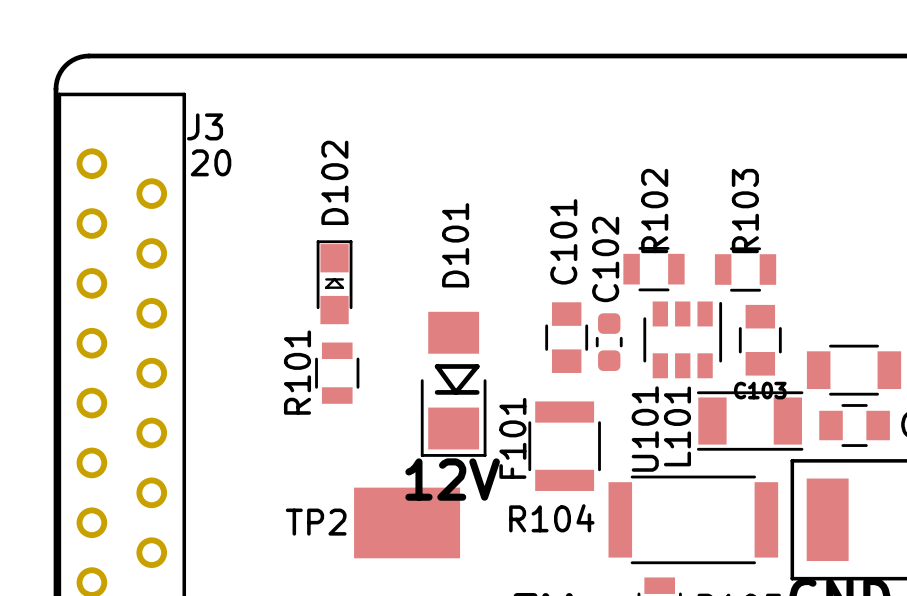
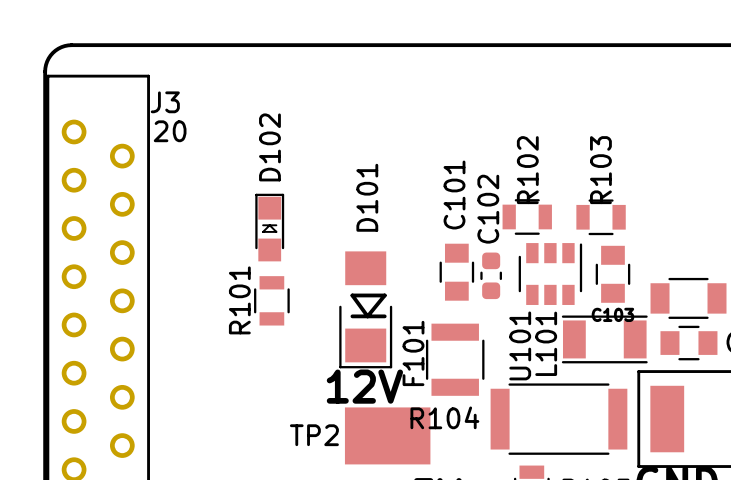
TP2 position: (407, 522) -> (387, 435)

